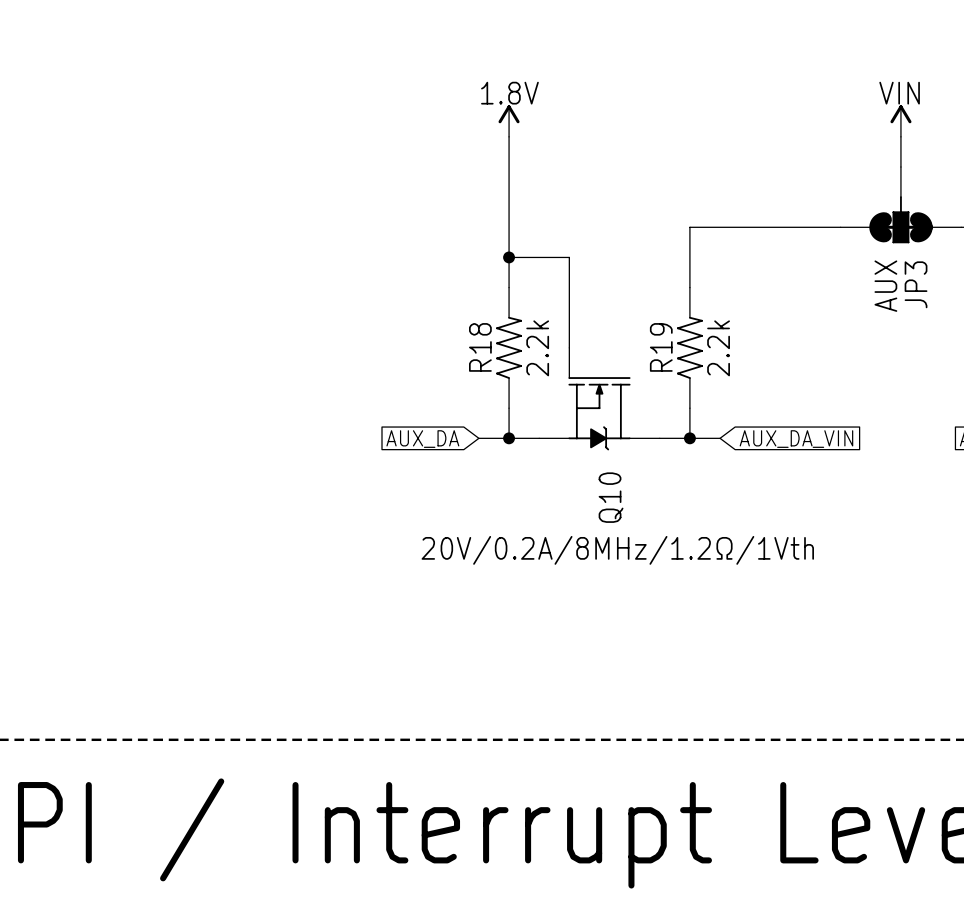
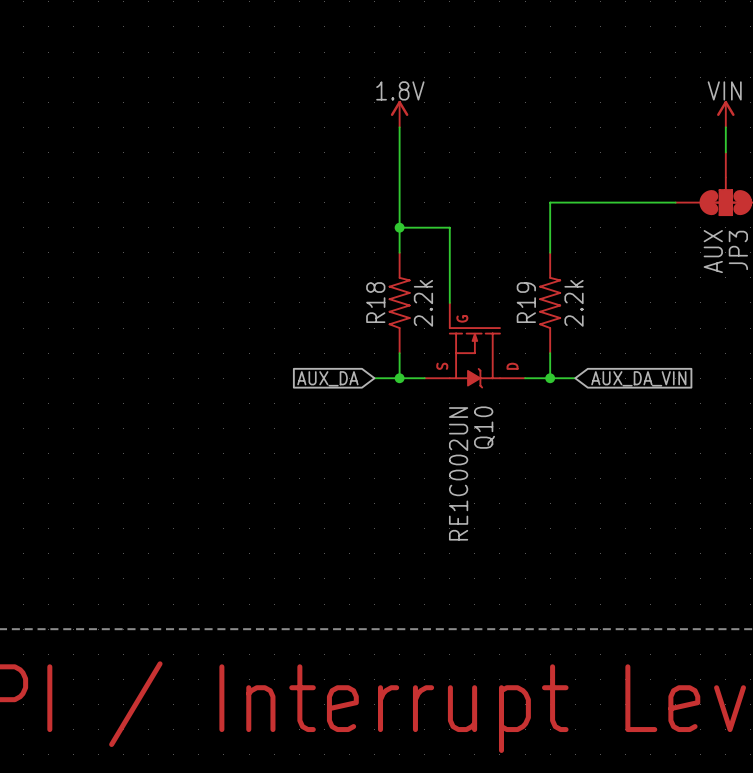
Q10 text: none -> G (462, 318)
Q10 text: none -> S (442, 366)
Q10 text: none -> D (512, 366)
Q10 value: 20V/0.2A/8MHz/1.2Ω/1Vth (617, 550) -> RE1C002UN (458, 473)

